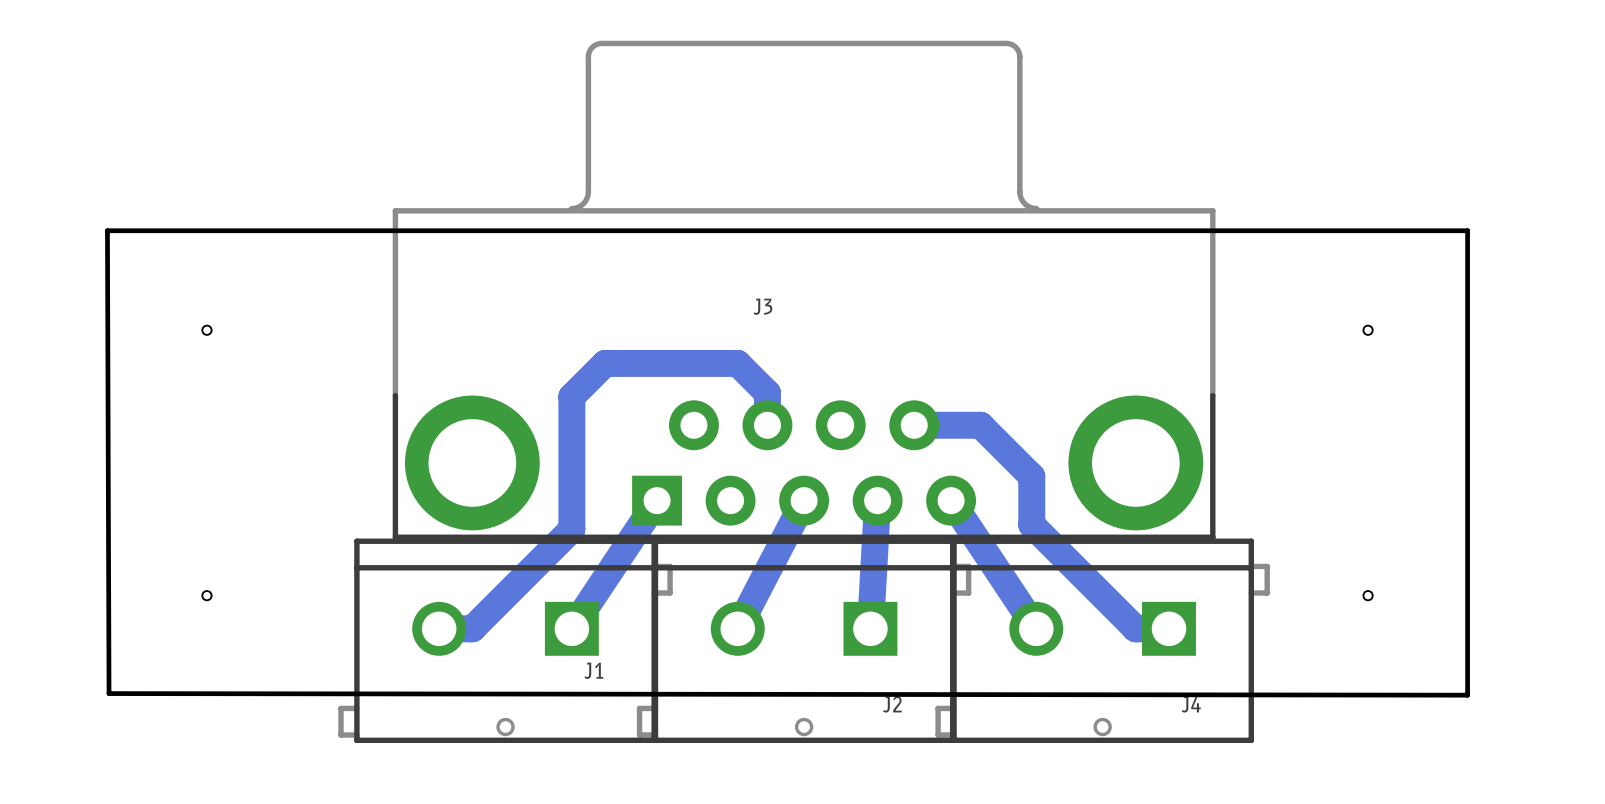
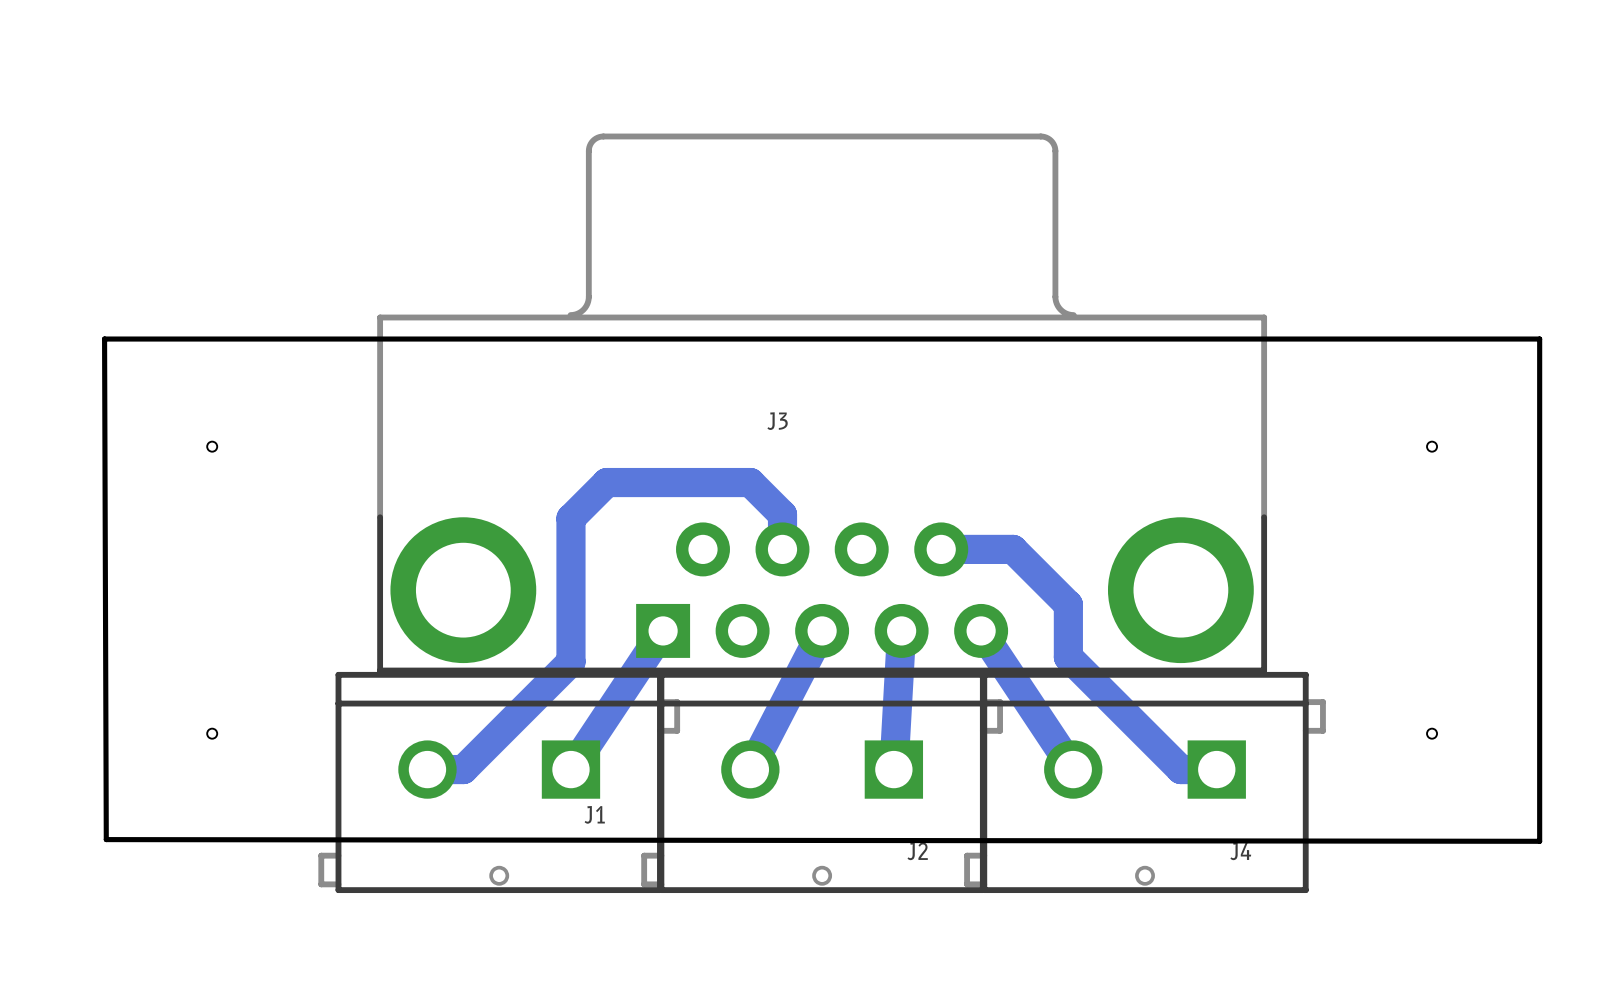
board edge: (107, 230) (140, 230) (107, 230) -> none
board edge: (107, 230) (109, 693) -> none
hole position: (206, 330) -> (212, 446)
hole position: (206, 595) -> (212, 733)
board edge: (109, 693) (1467, 695) (109, 693) -> (106, 839) (1539, 841) (106, 839)
board edge: none -> (106, 839) (104, 339) (106, 839)

